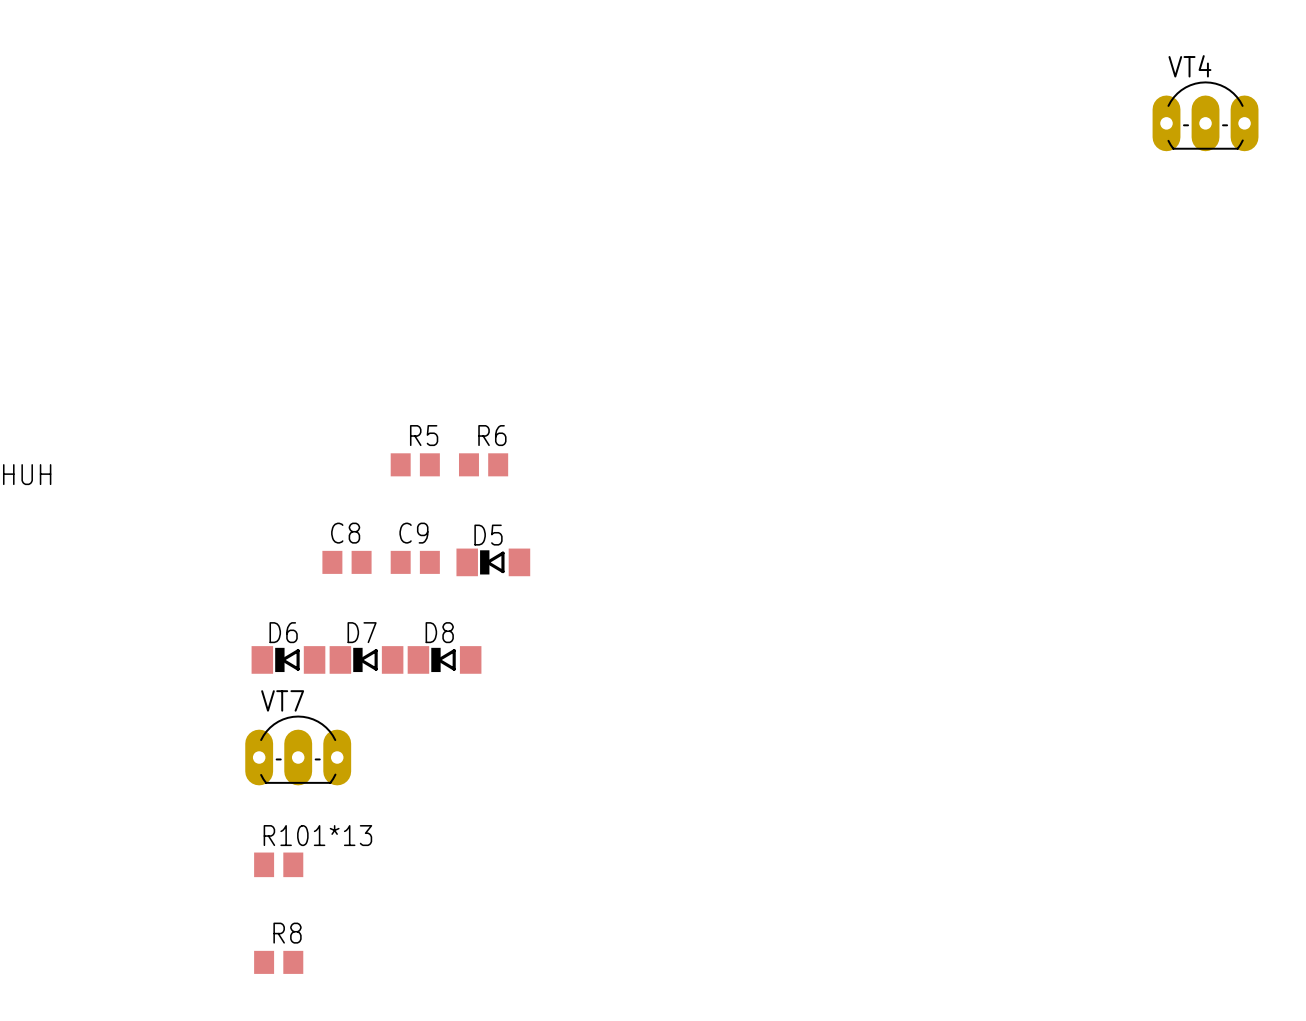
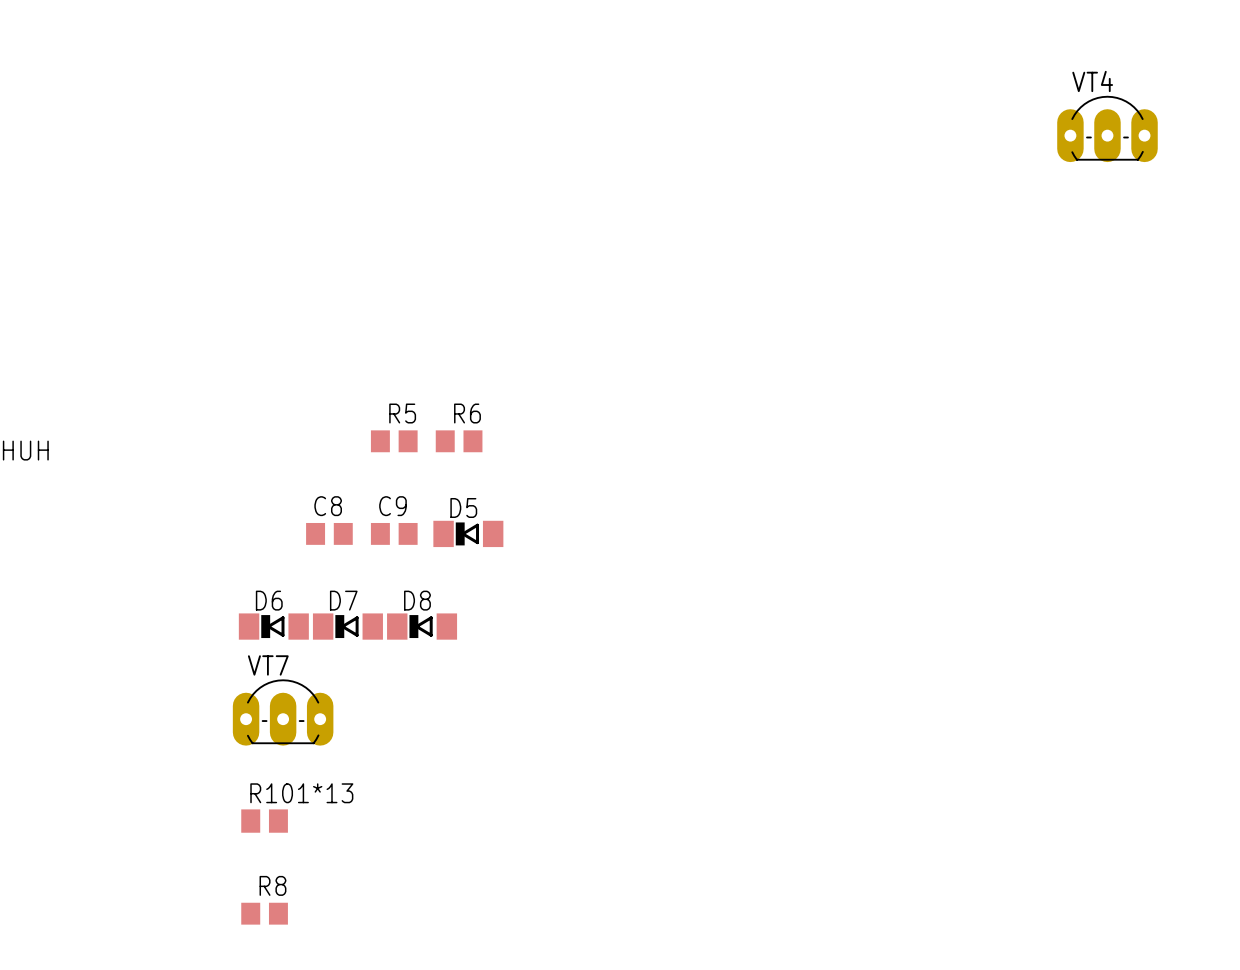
VT4 position: (1205, 116) -> (1107, 128)

